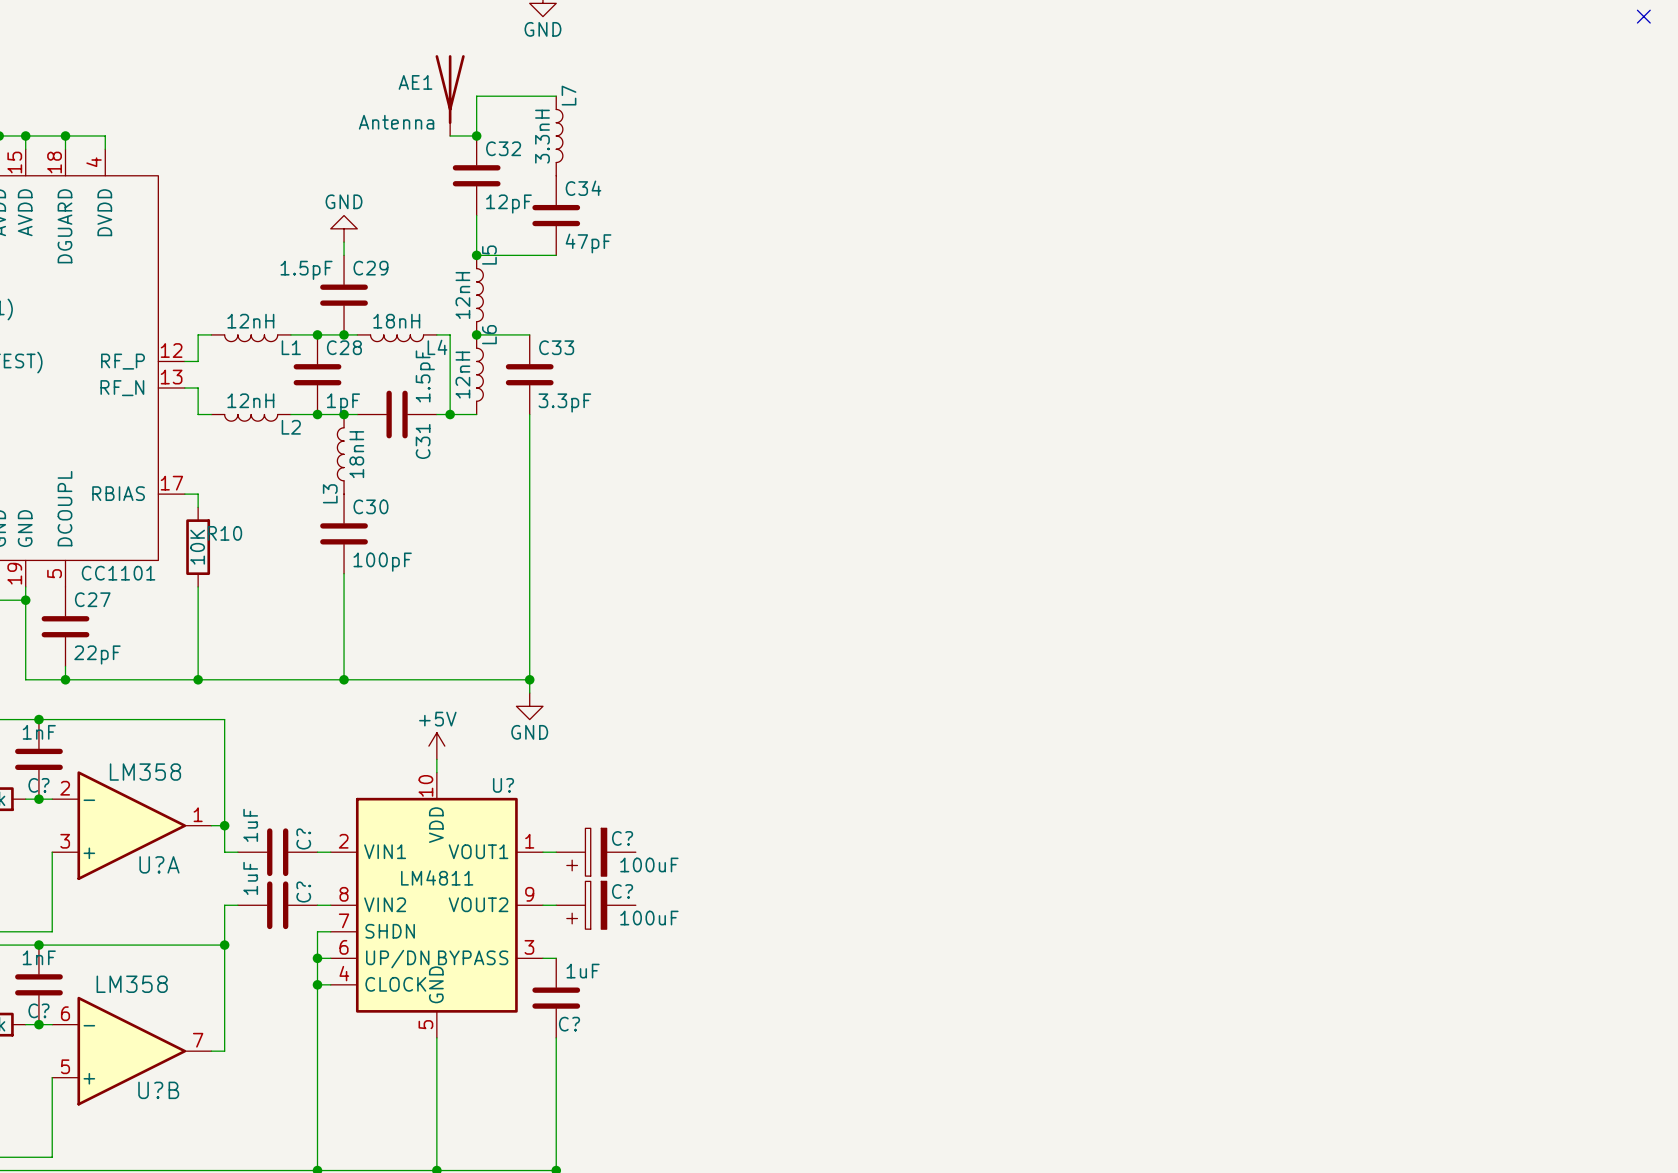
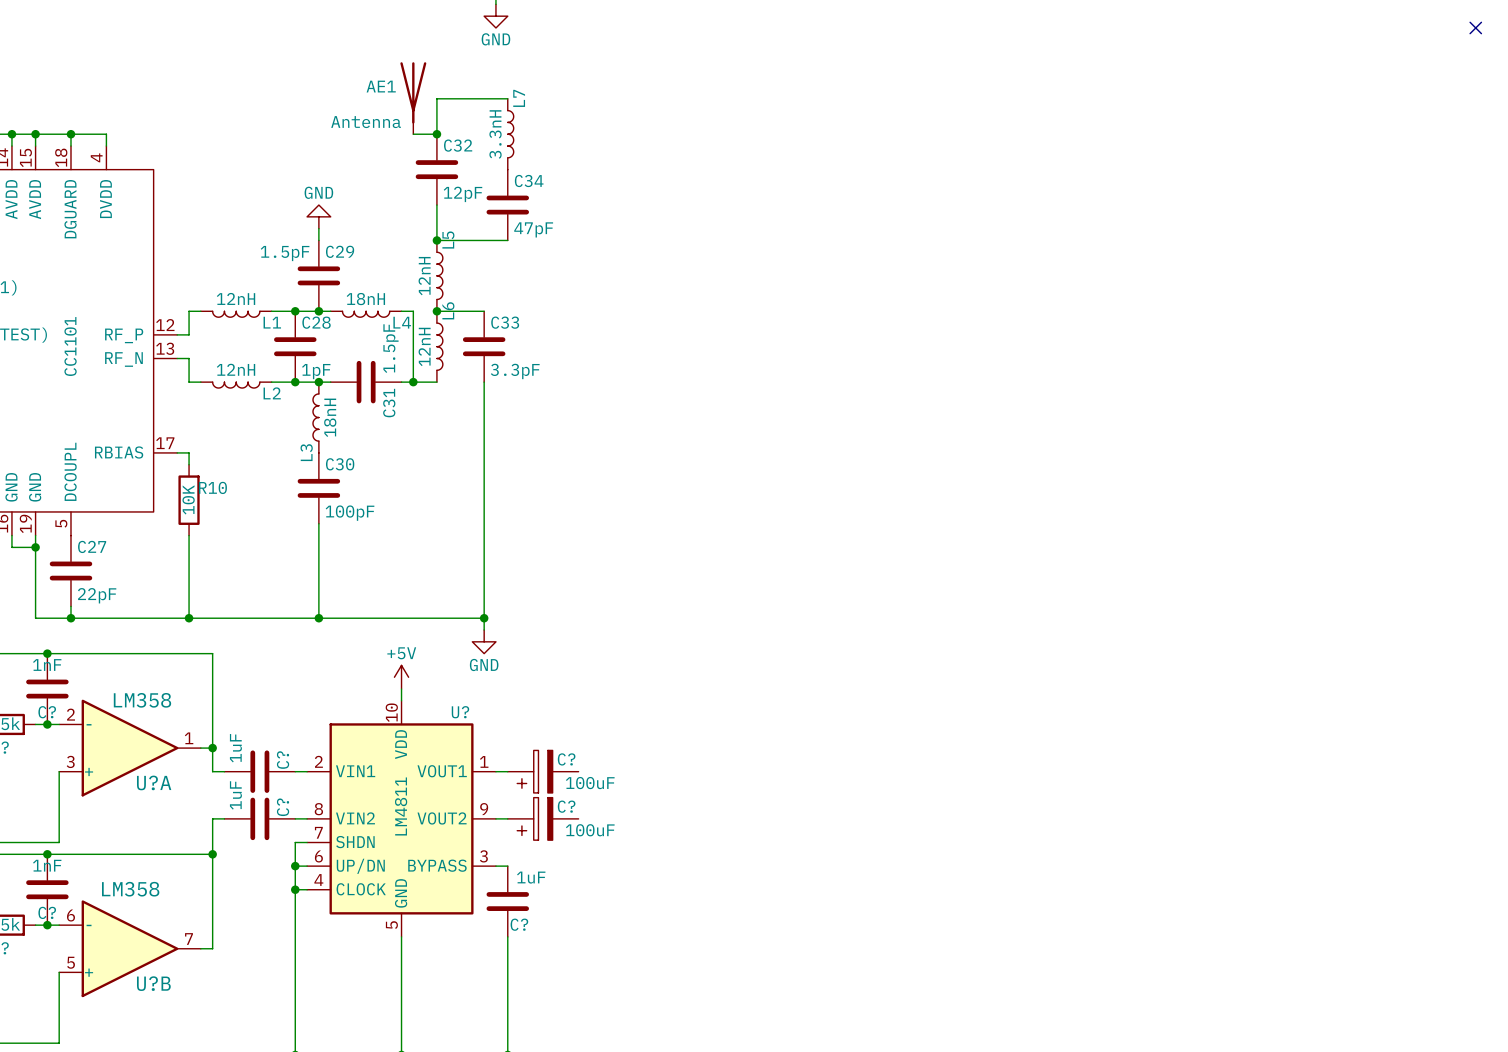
part value rotation: 0° (118, 573) -> 90° counterclockwise (70, 346)
part value position: CC1101 (118, 573) -> CC1101 (70, 346)
U? value rotation: 0° (437, 877) -> 90° counterclockwise (401, 806)

